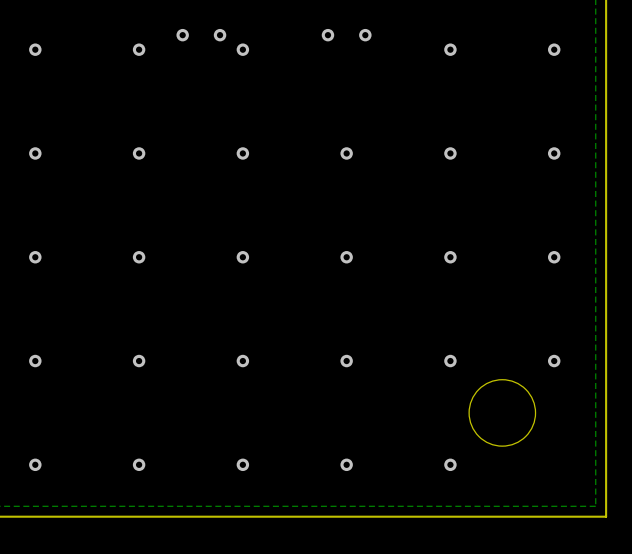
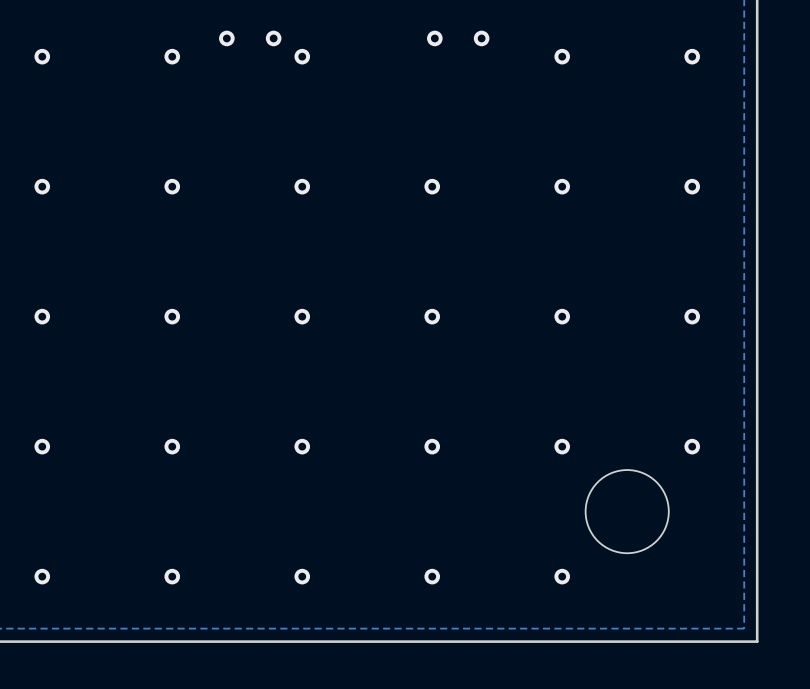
via: (327, 35) -> none
via: none -> (434, 38)
via: (365, 35) -> none
via: none -> (481, 38)

